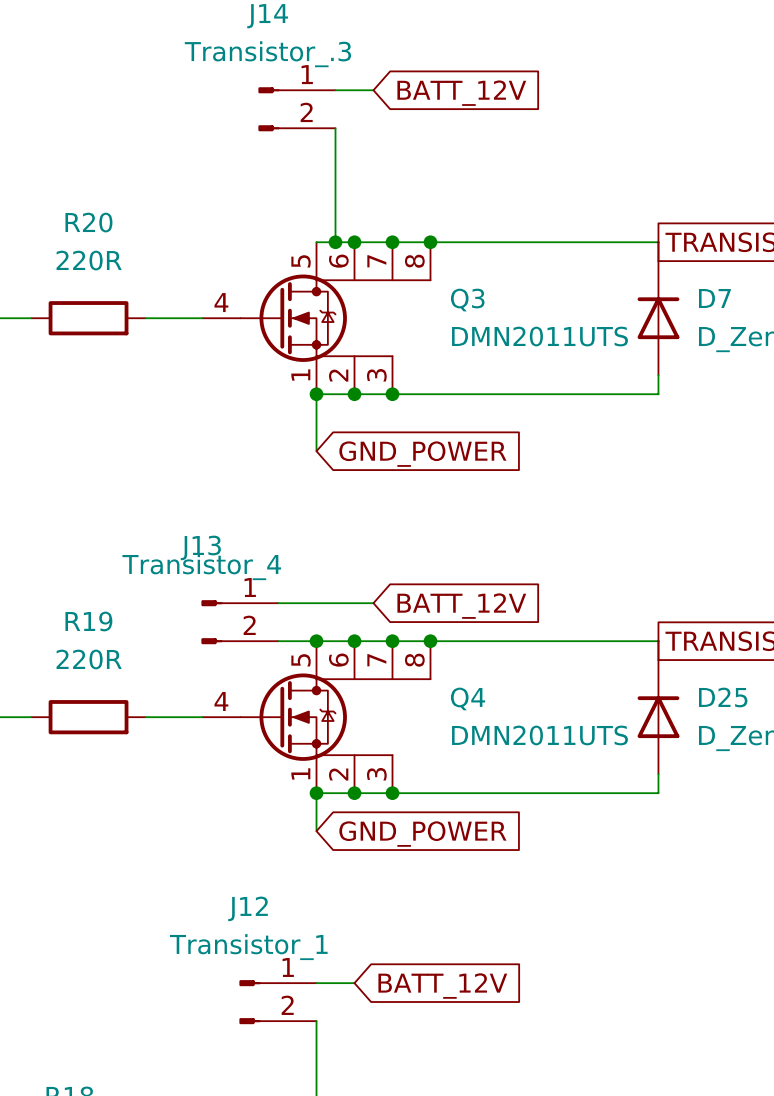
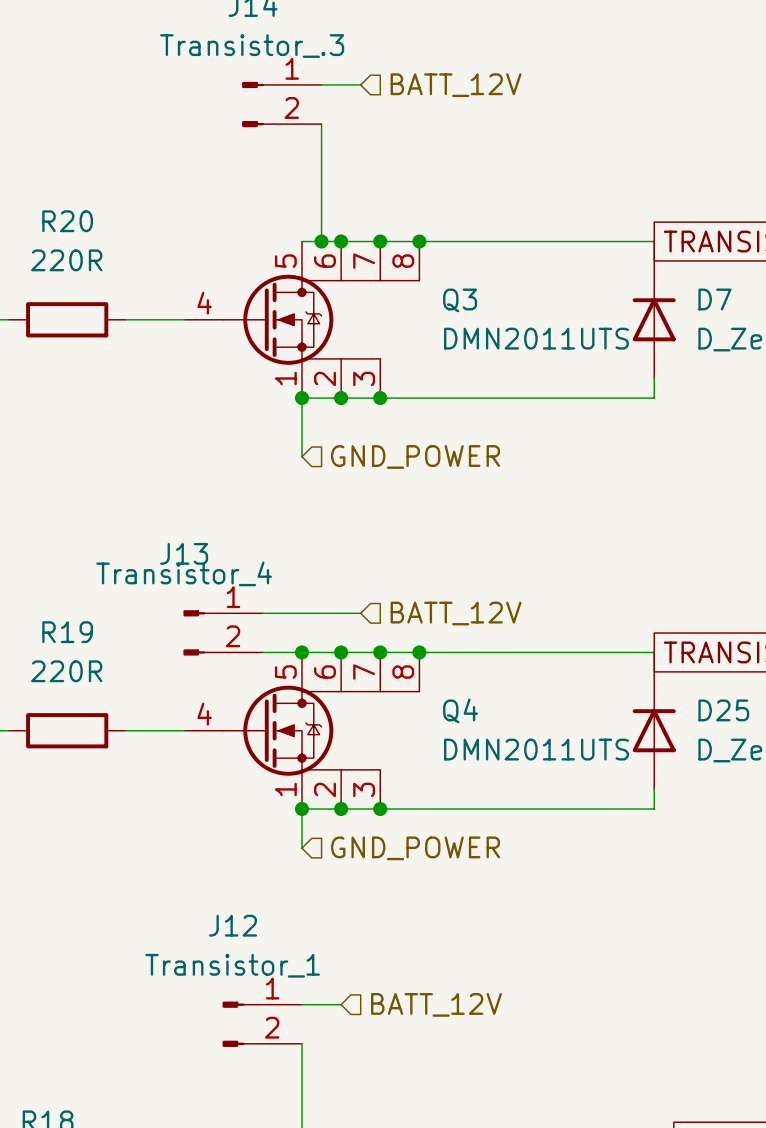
hierarchical label: none -> BATT_12V (456, 85)
global label: BATT_12V (461, 93) -> none
hierarchical label: none -> GND_POWER (415, 456)
global label: GND_POWER (422, 454) -> none
hierarchical label: none -> BATT_12V (456, 613)
global label: BATT_12V (461, 606) -> none
hierarchical label: none -> GND_POWER (415, 848)
global label: GND_POWER (422, 834) -> none
hierarchical label: none -> BATT_12V (436, 1004)
global label: BATT_12V (442, 986) -> none

